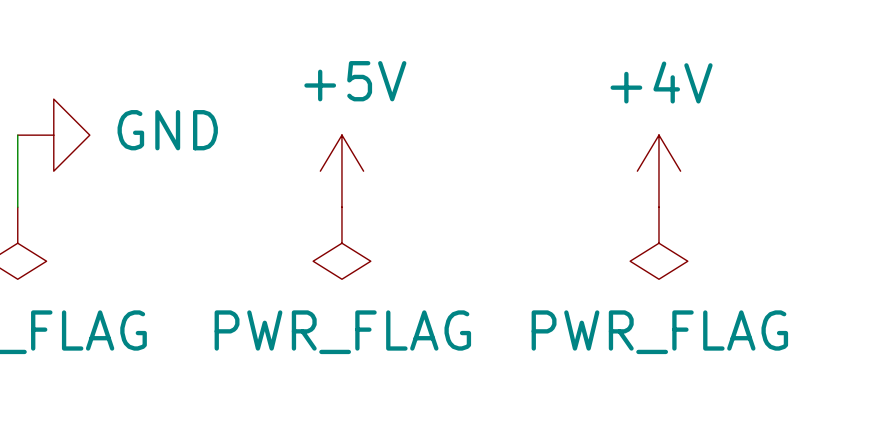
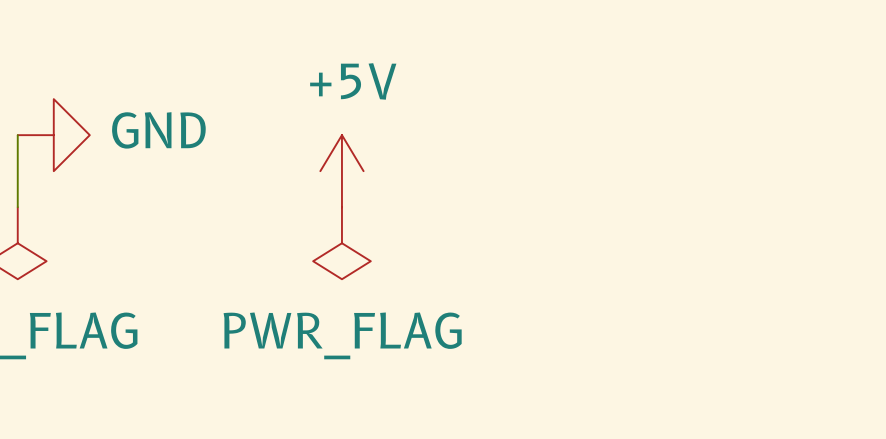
power symbol: +4V (658, 171) -> none
power symbol: PWR_FLAG (658, 243) -> none

